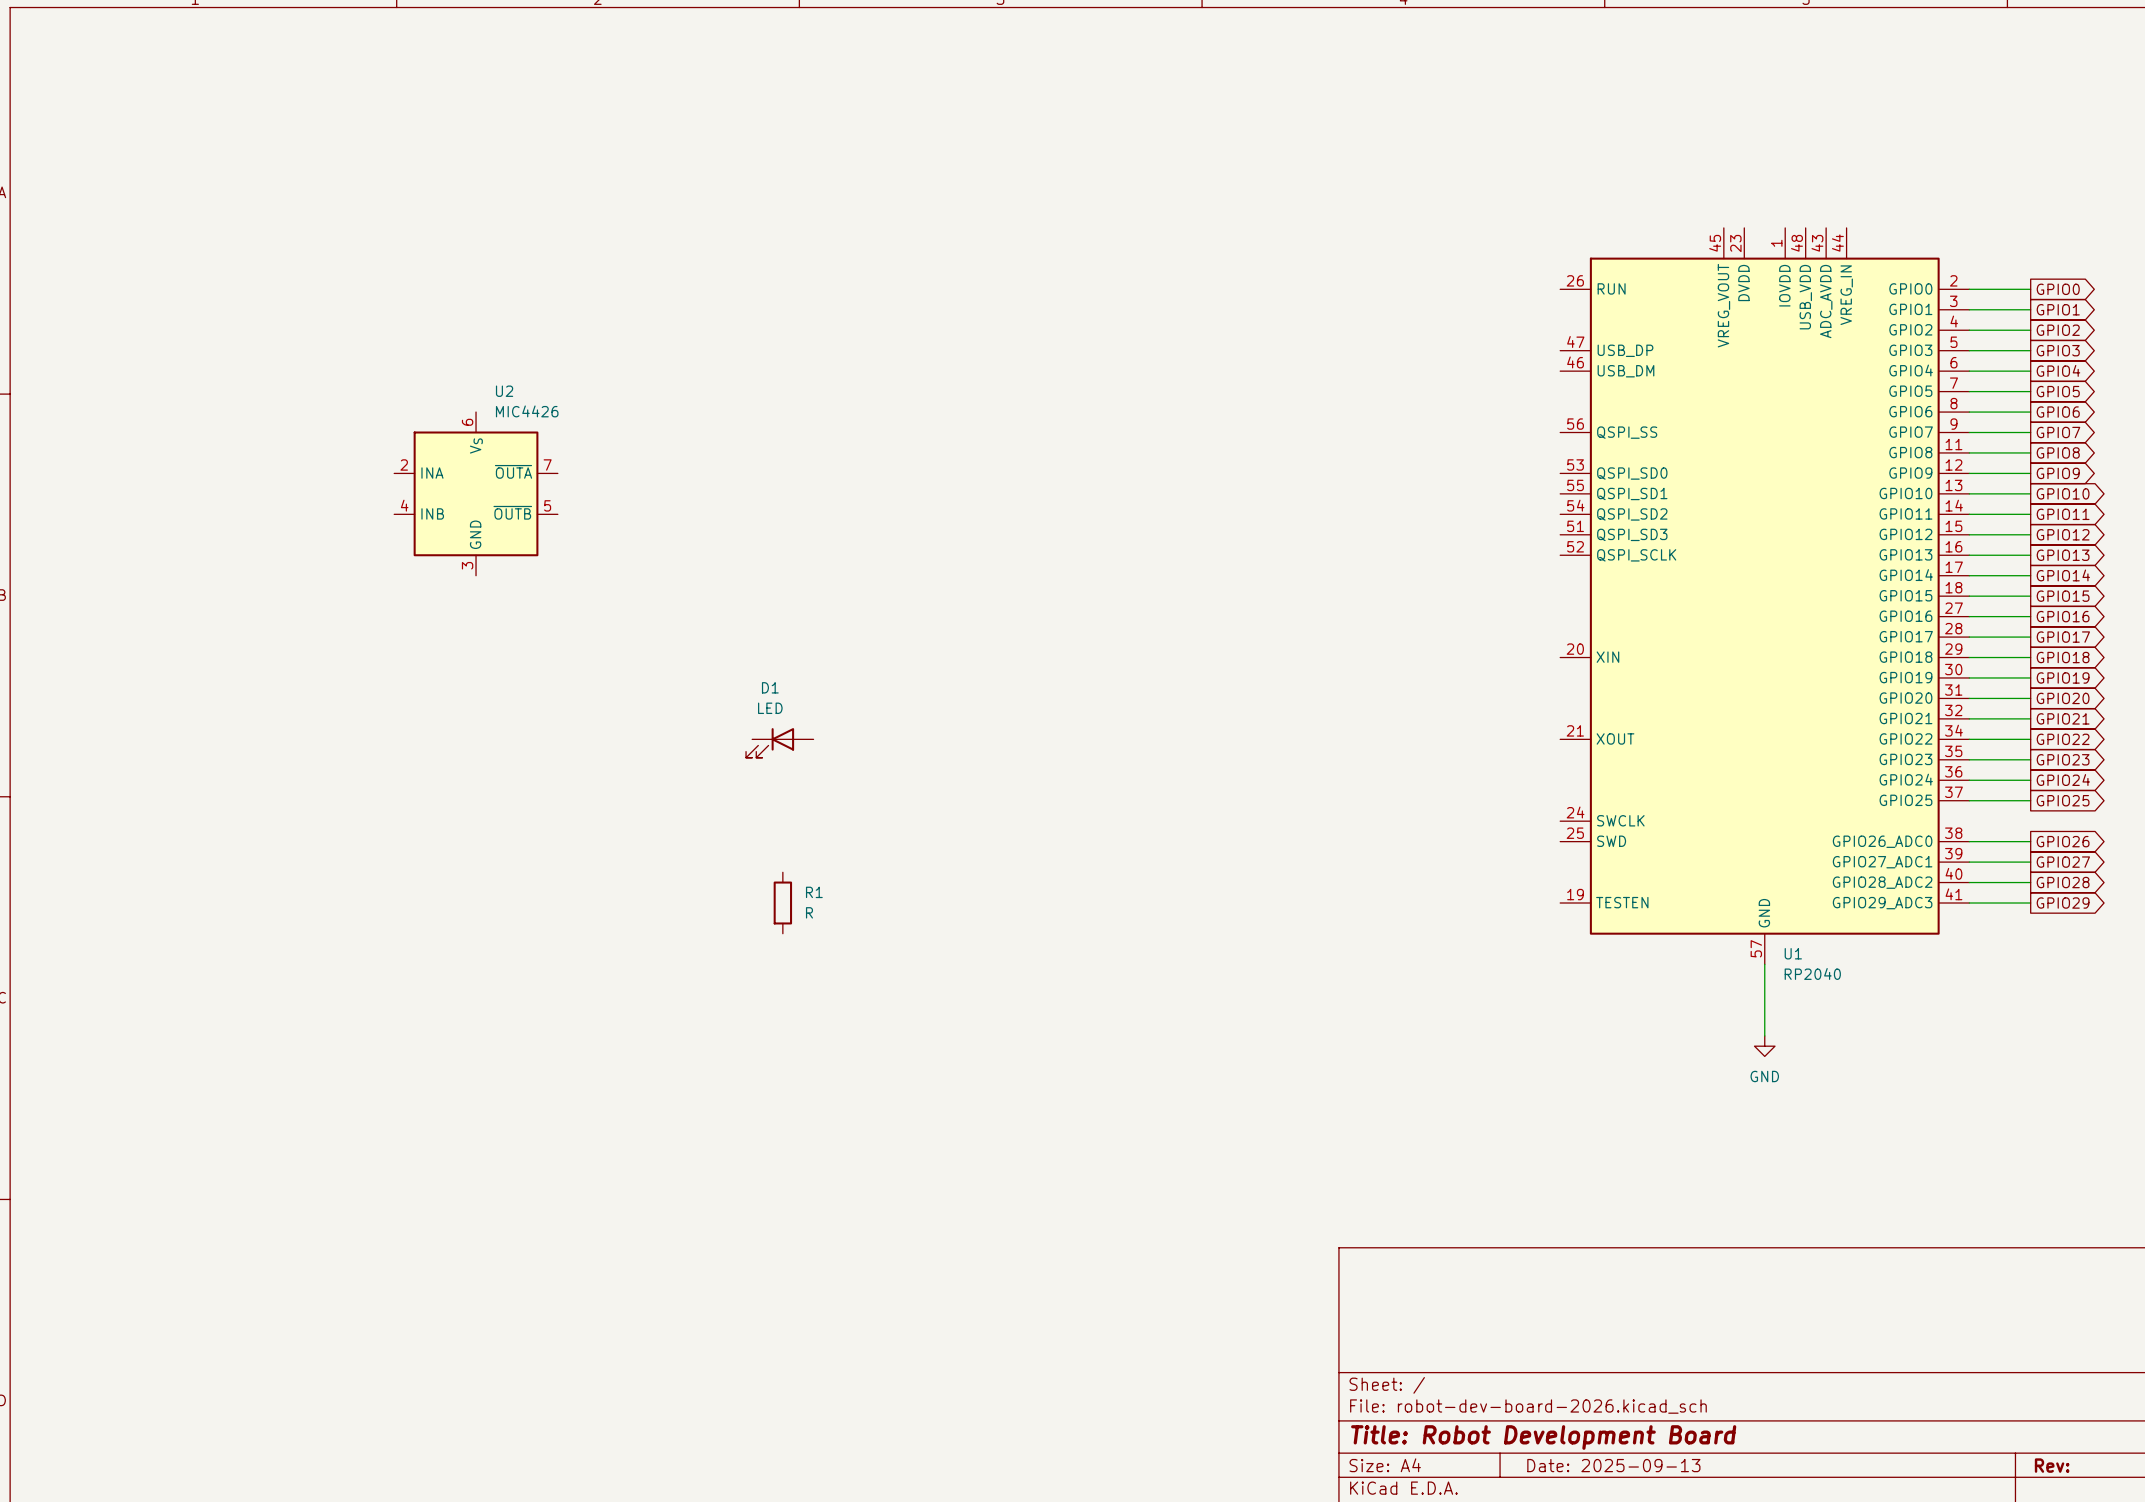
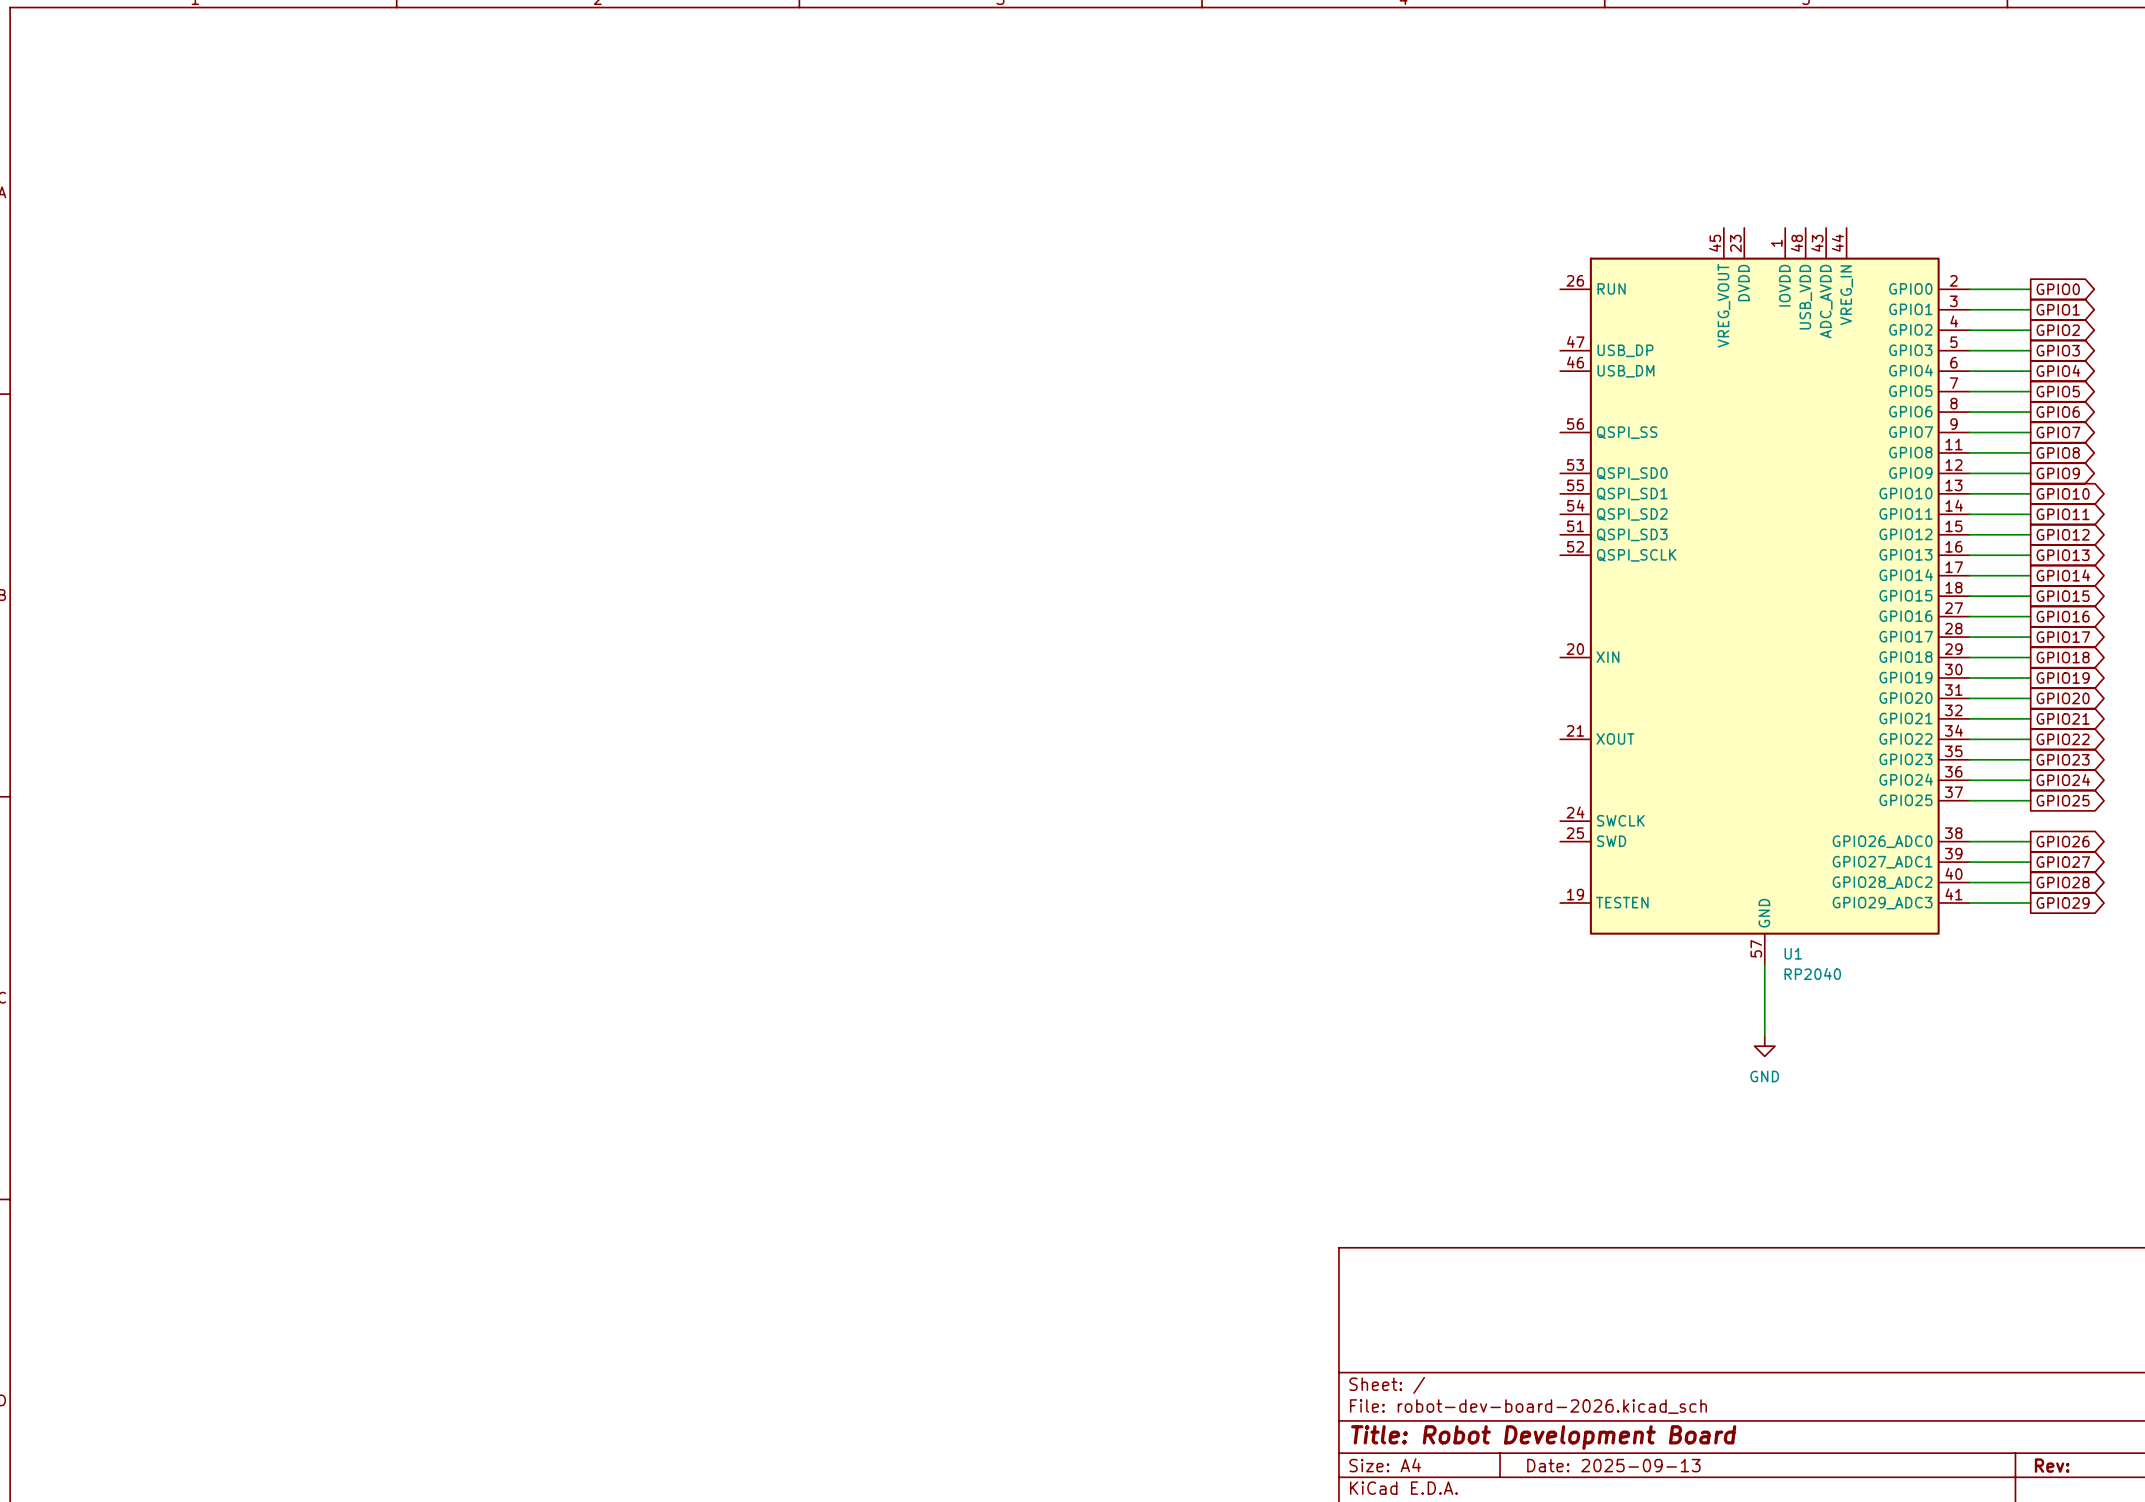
U2: MIC4426 (476, 493) -> none
D1: LED (779, 742) -> none
R1: R (782, 903) -> none

